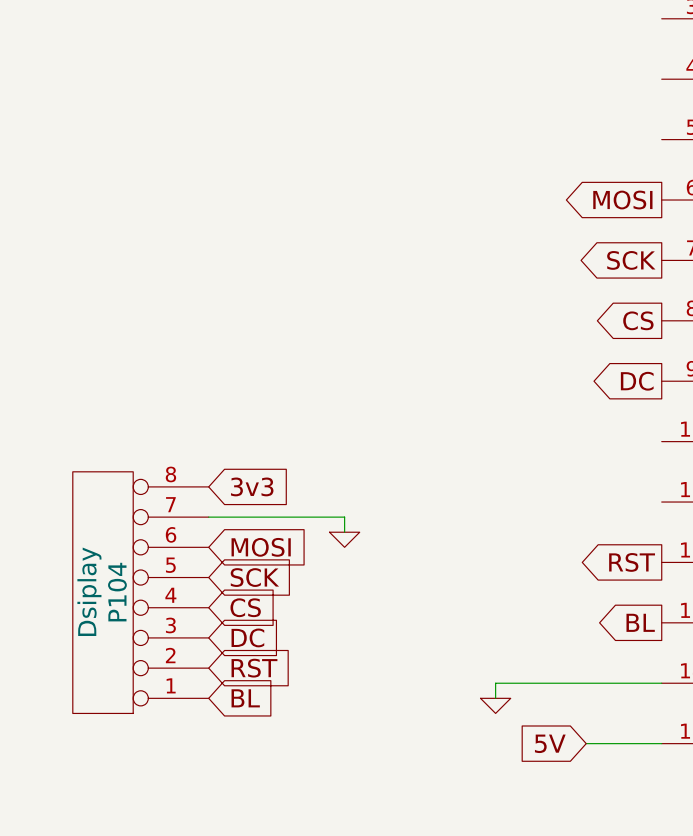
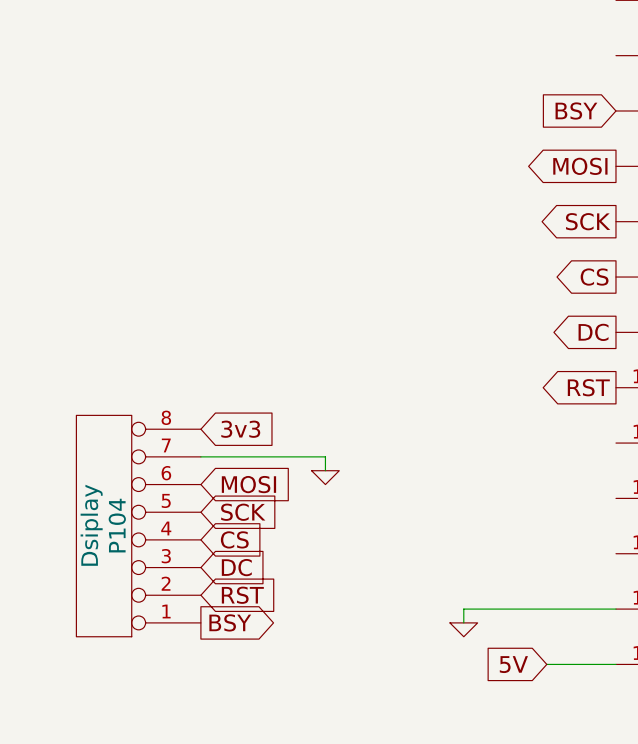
global label: none -> BSY (576, 111)
global label position: RST (632, 562) -> RST (588, 387)
global label: BL (640, 622) -> none
global label shape: input (245, 698) -> output (230, 622)
global label: BL (245, 698) -> BSY (230, 622)

